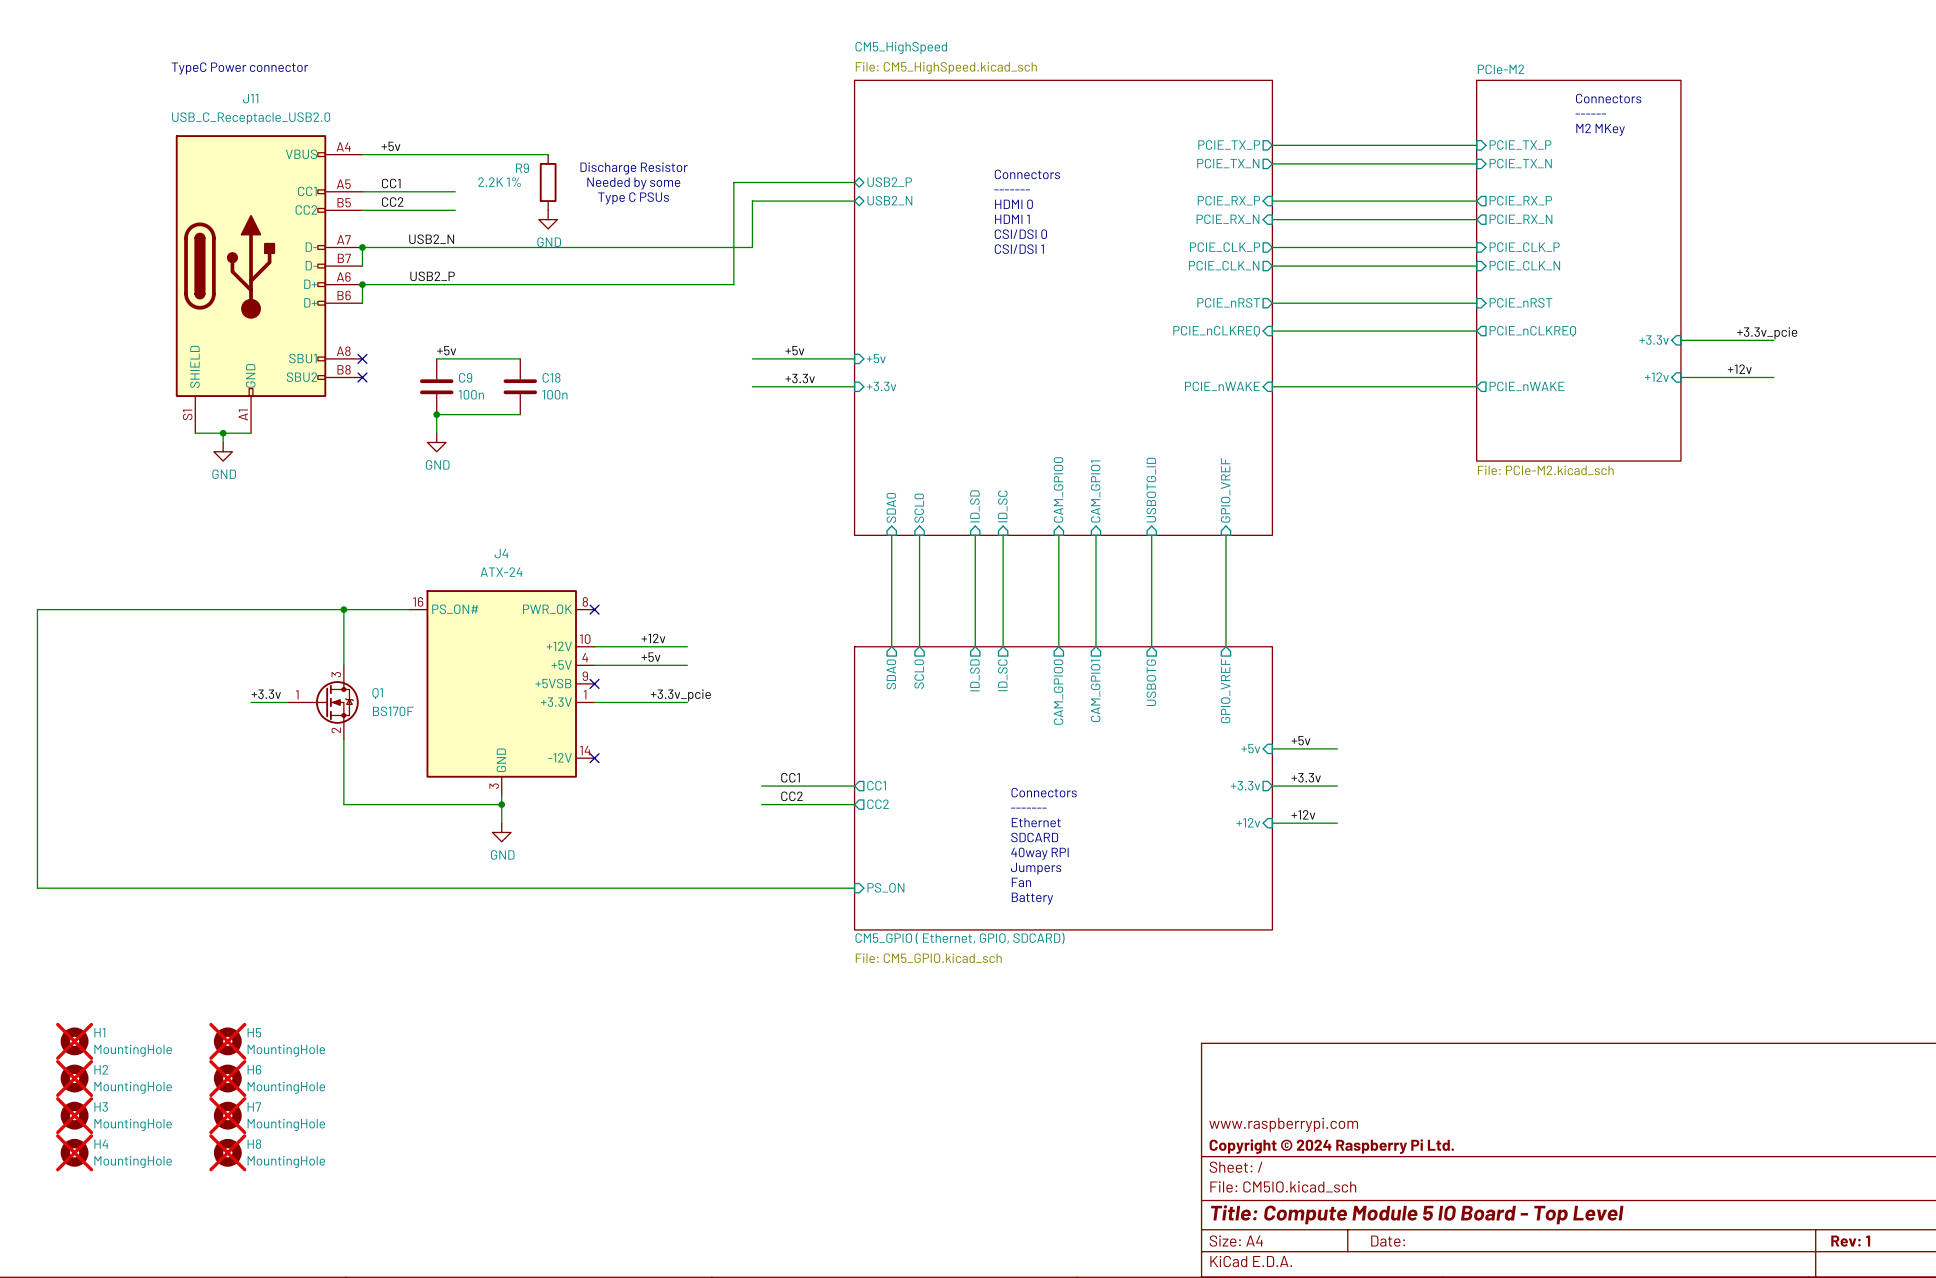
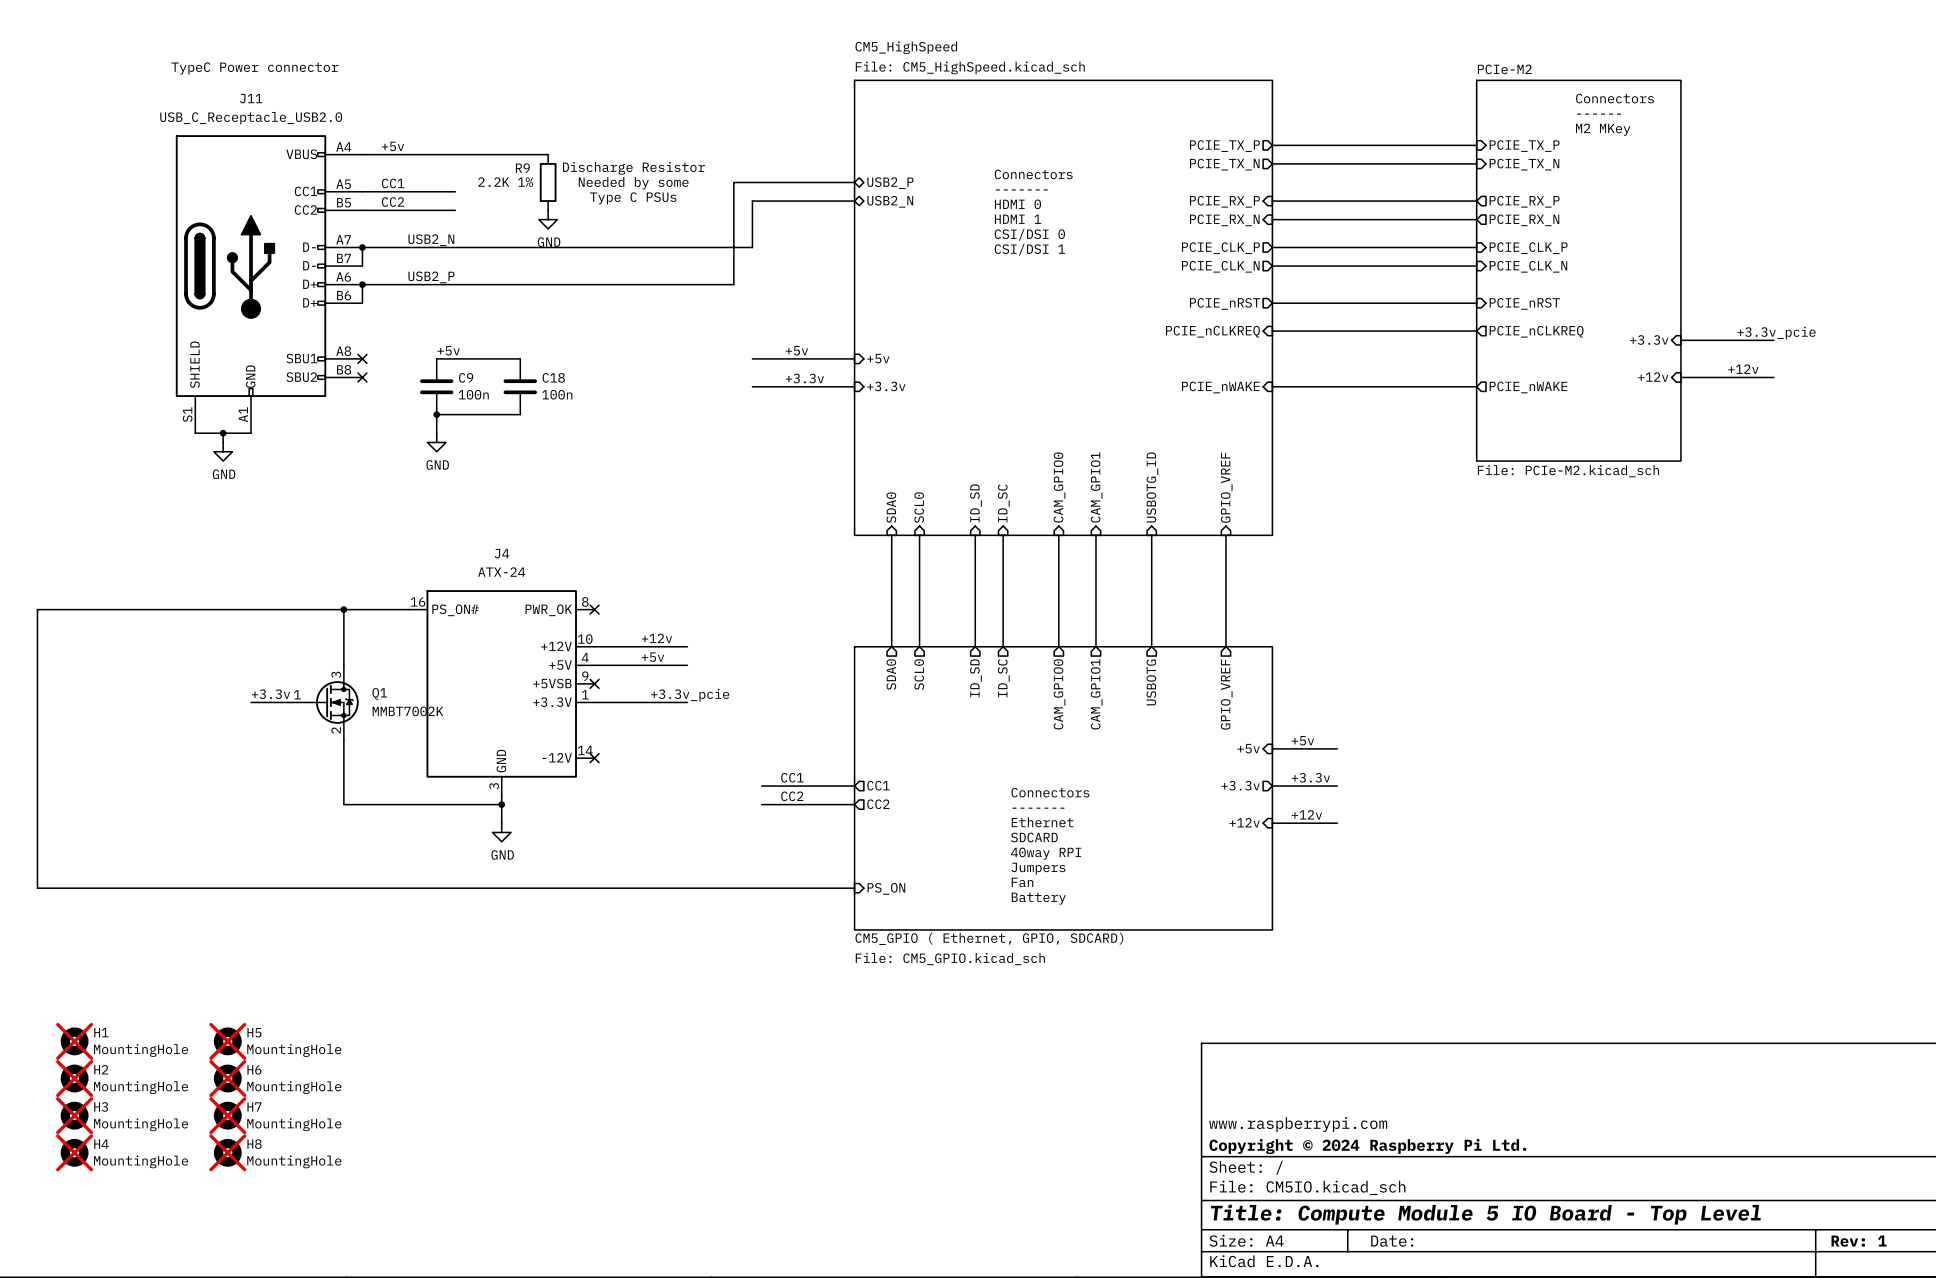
Q1 value: BS170F (393, 711) -> MMBT7002K (407, 711)

